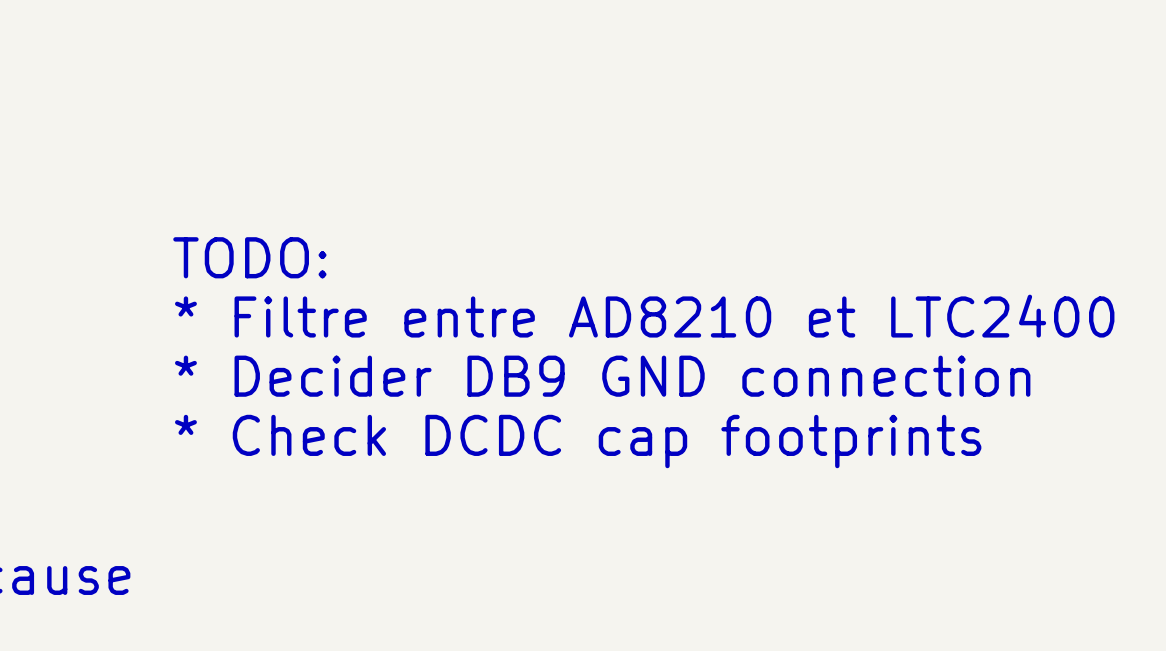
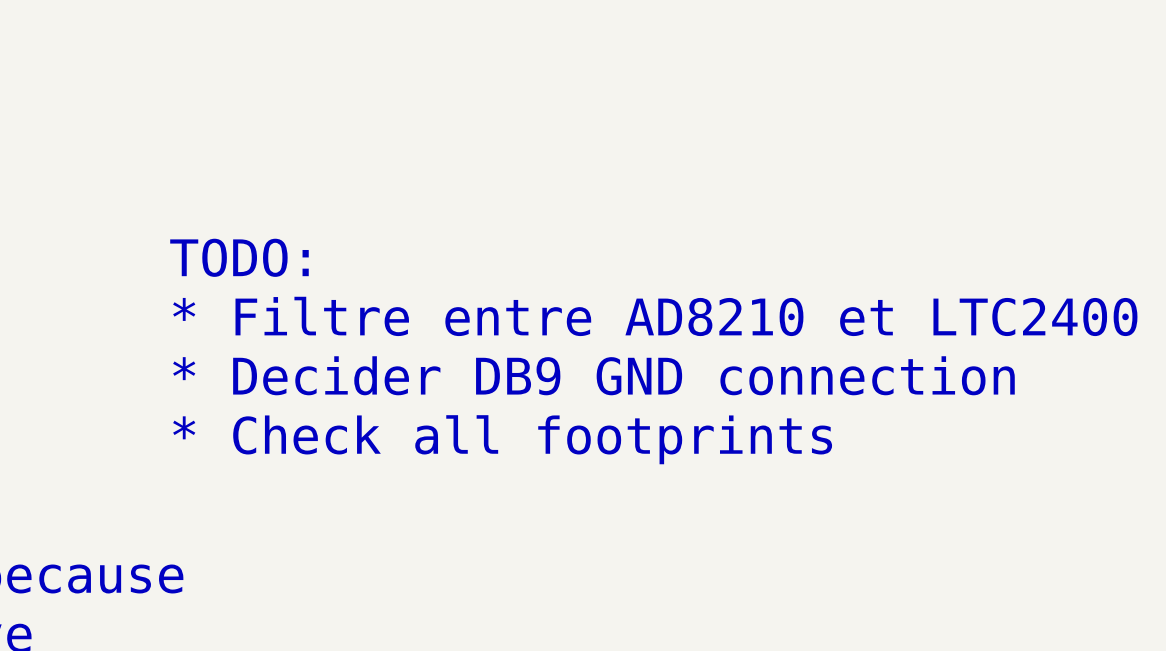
text: * Check DCDC cap footprints (578, 441) -> * Check all footprints (502, 439)

